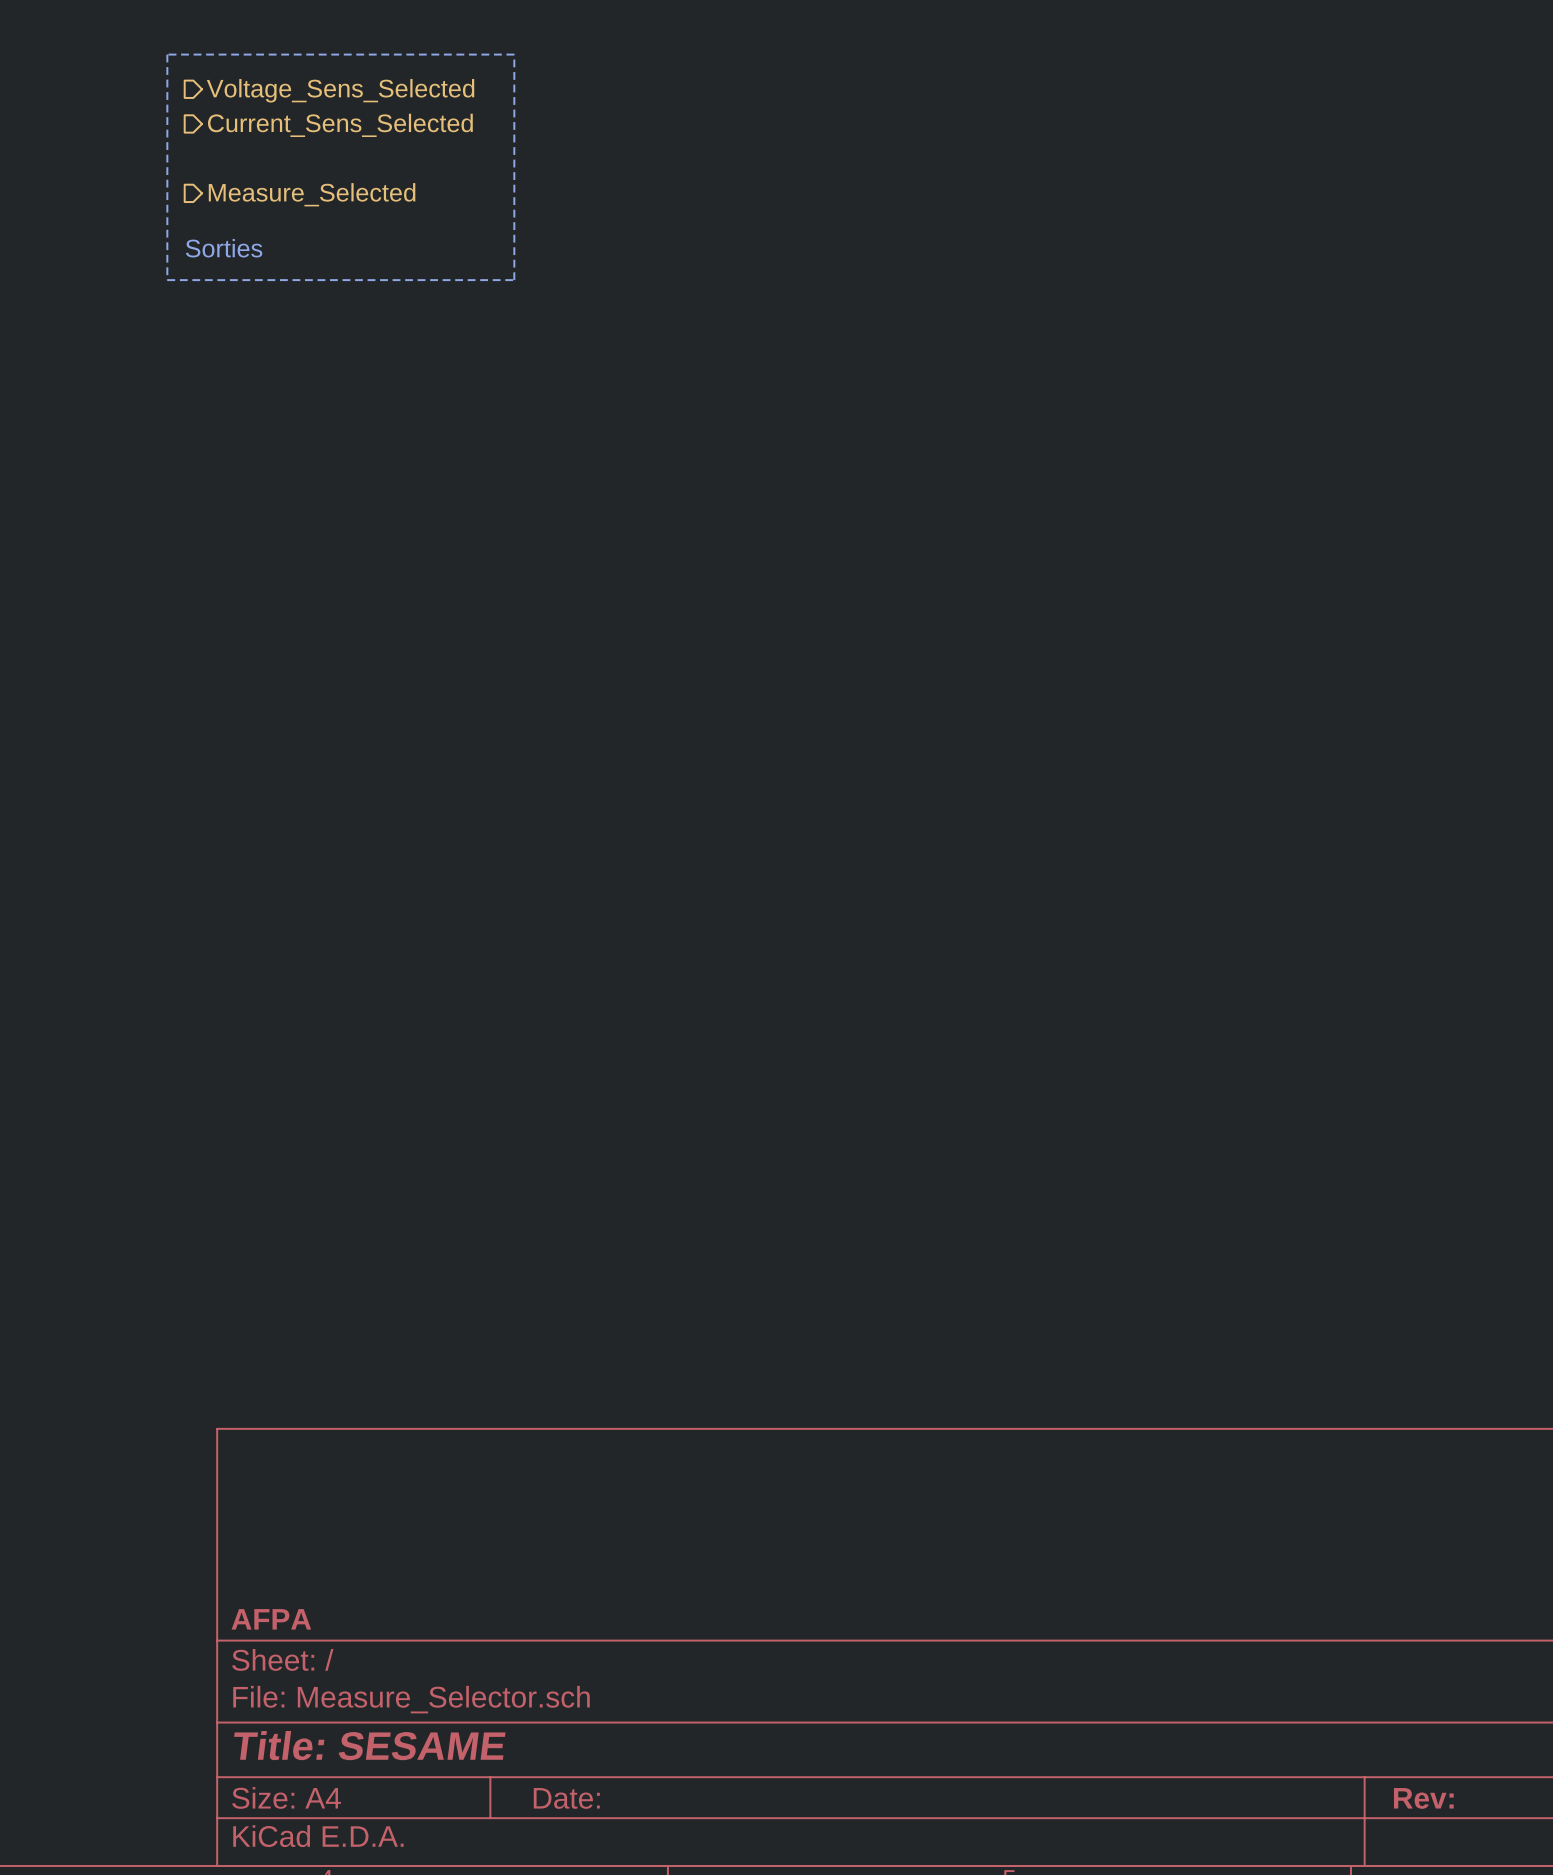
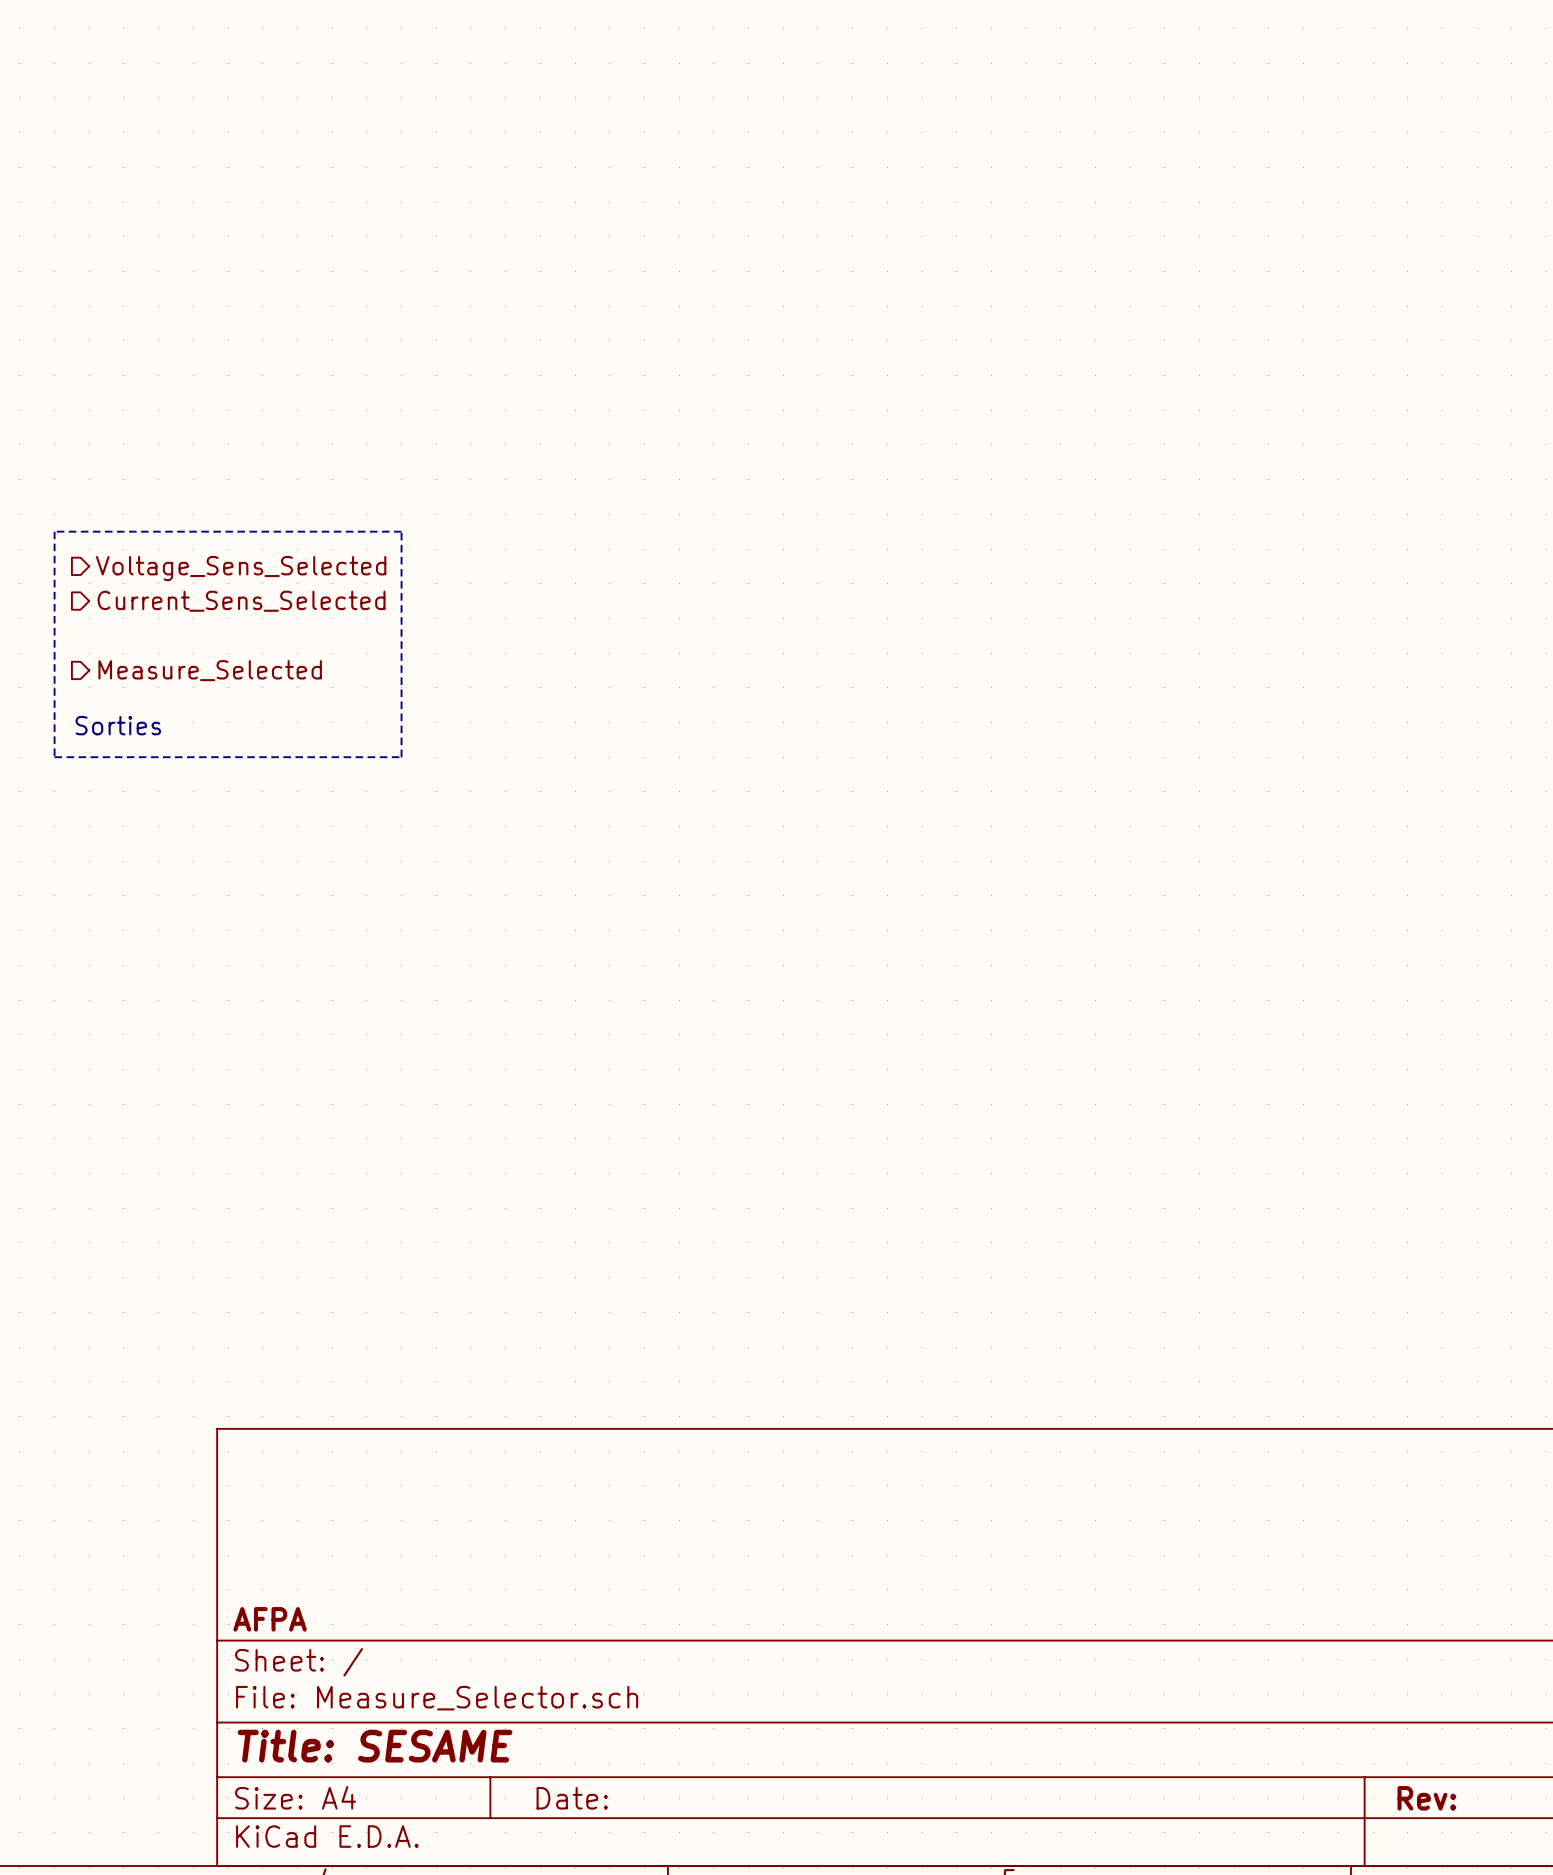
line: (167, 54) (167, 280) (514, 280) (514, 54) (167, 54) -> none
hierarchical label: Voltage_Sens_Selected (340, 90) -> none
hierarchical label: Current_Sens_Selected (340, 125) -> none
hierarchical label: Measure_Selected (312, 194) -> none
text: Sorties (224, 248) -> none
line: none -> (54, 531) (54, 757) (401, 757) (401, 531) (54, 531)
hierarchical label: none -> Voltage_Sens_Selected (241, 568)
hierarchical label: none -> Current_Sens_Selected (241, 601)
hierarchical label: none -> Measure_Selected (210, 670)
text: none -> Sorties (118, 725)

